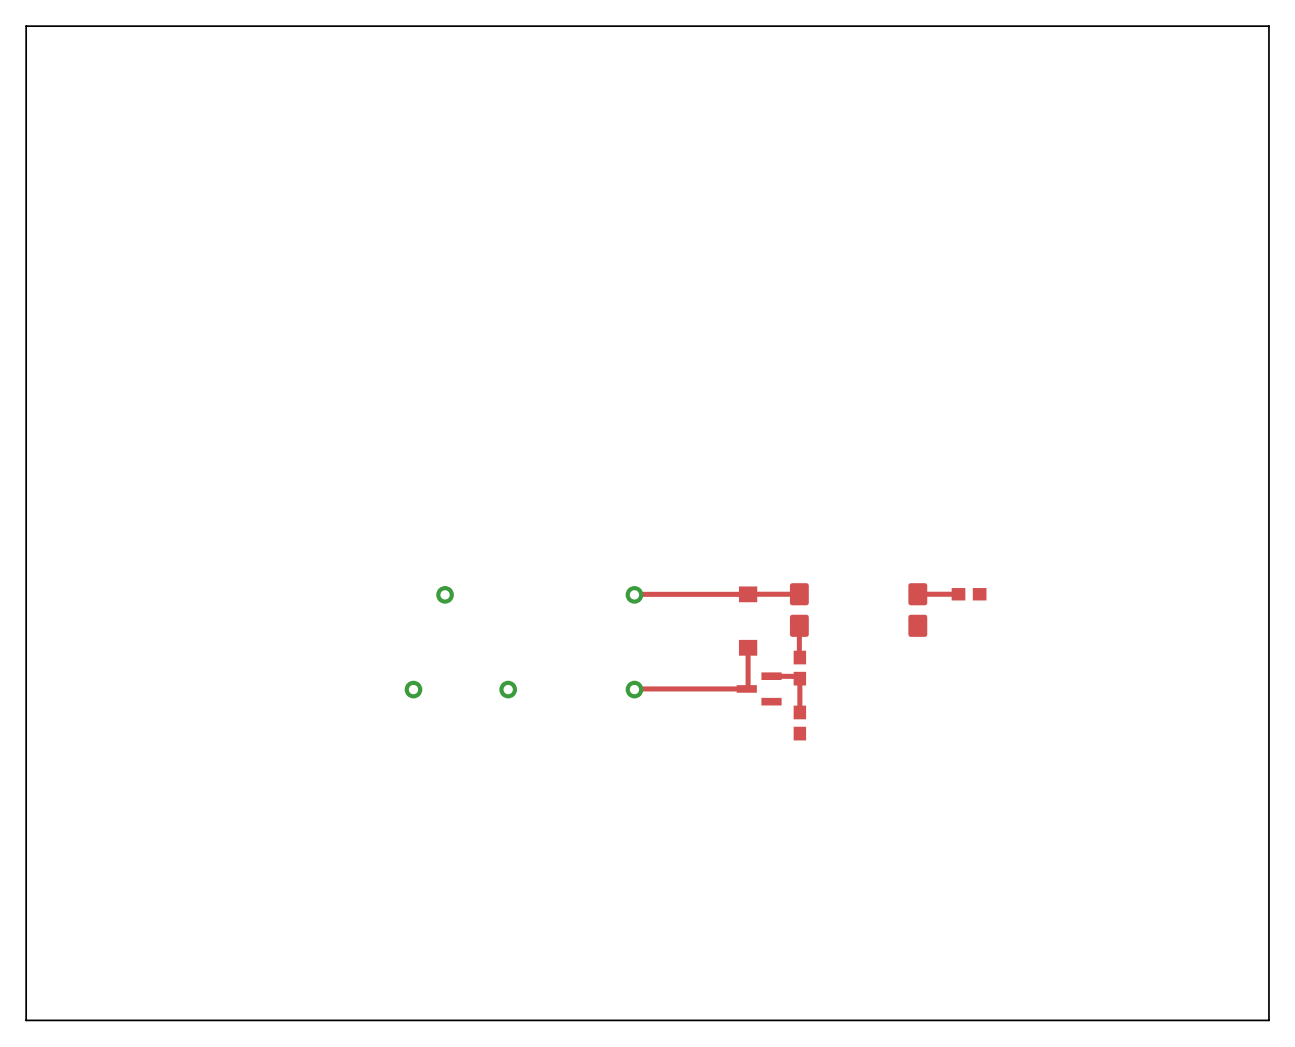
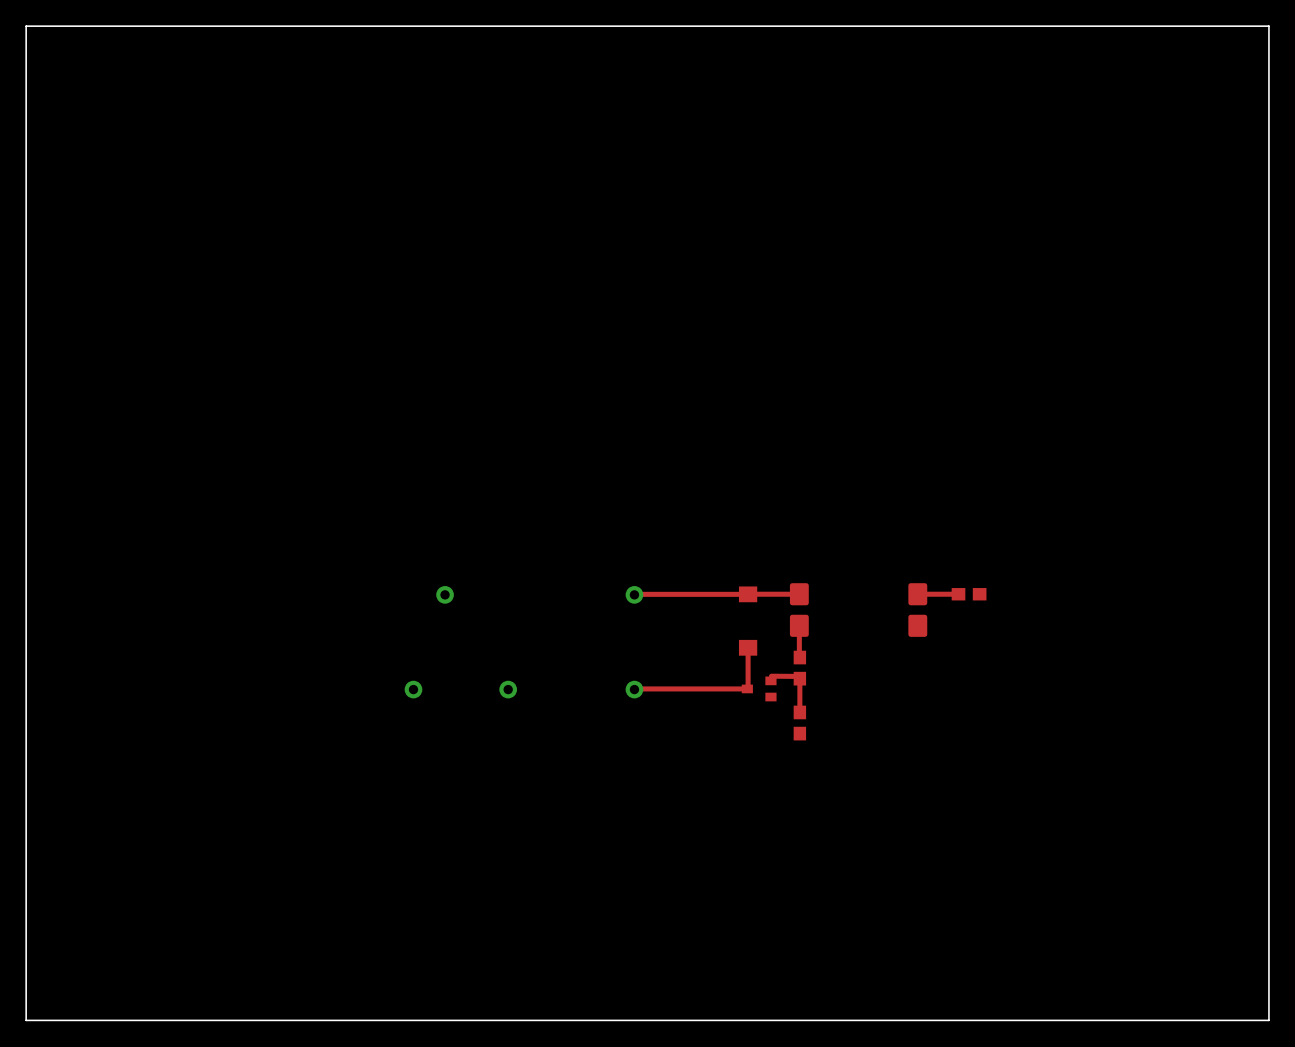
part footprint: [736, 672, 782, 706] -> [741, 676, 777, 702]

